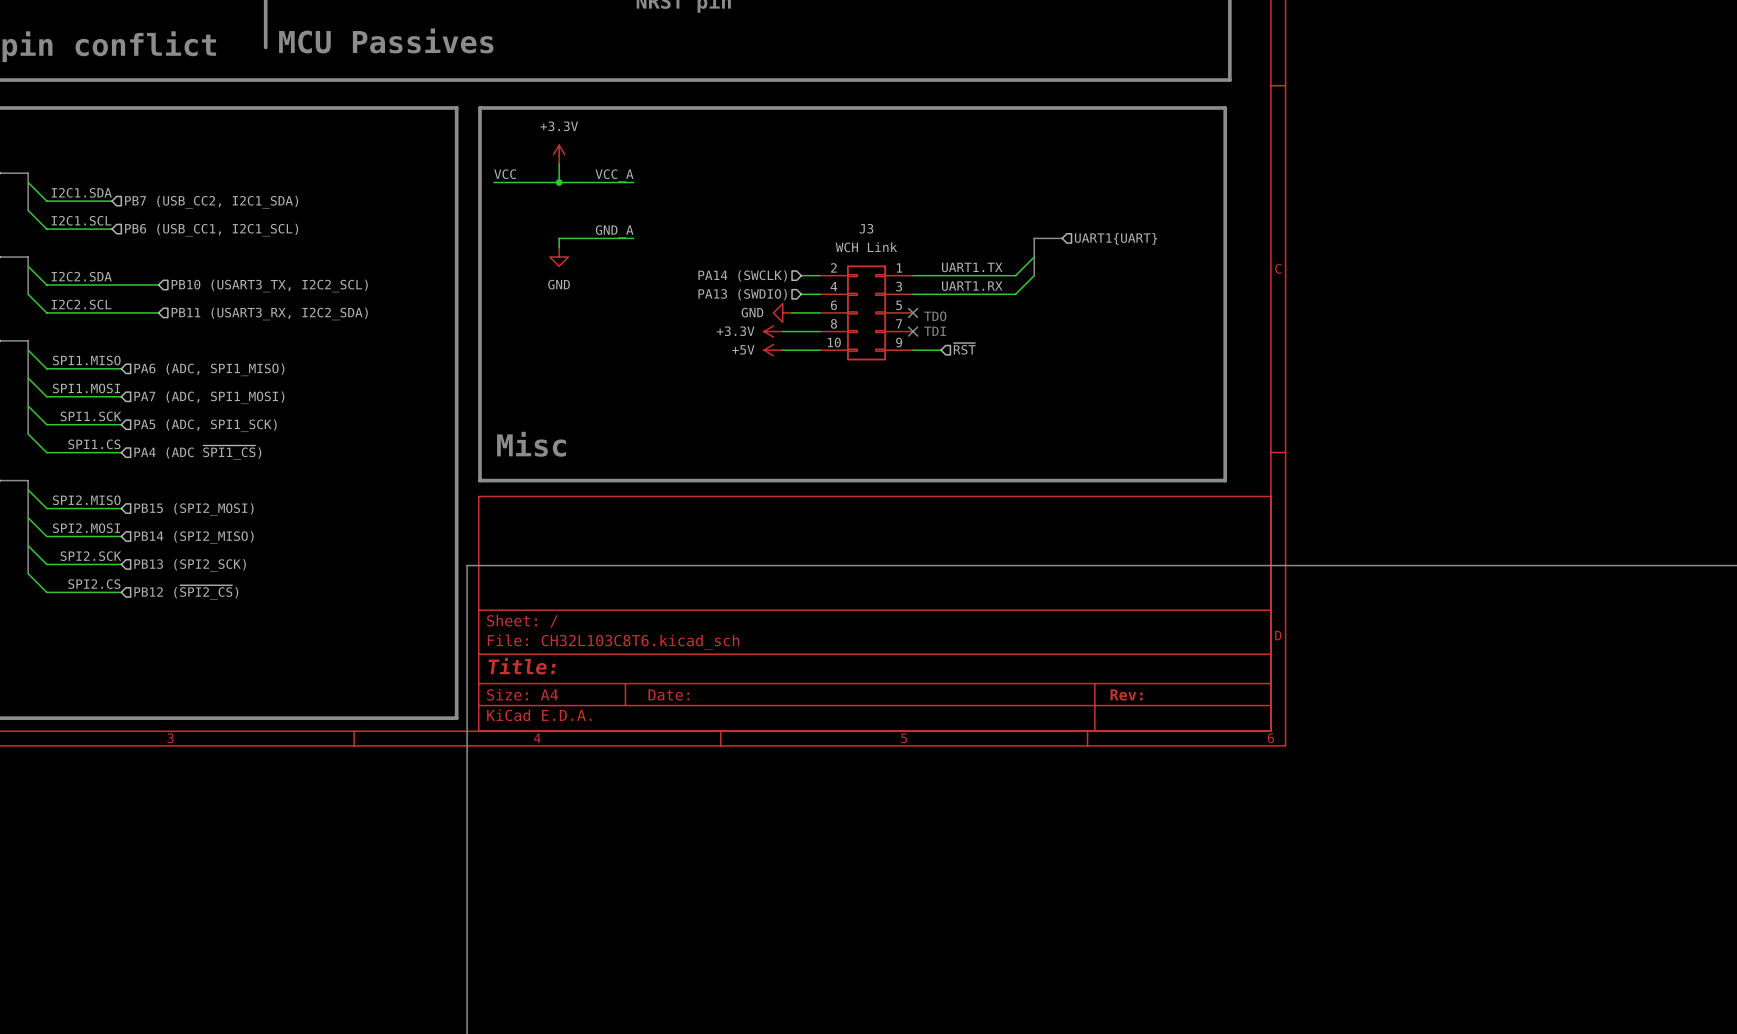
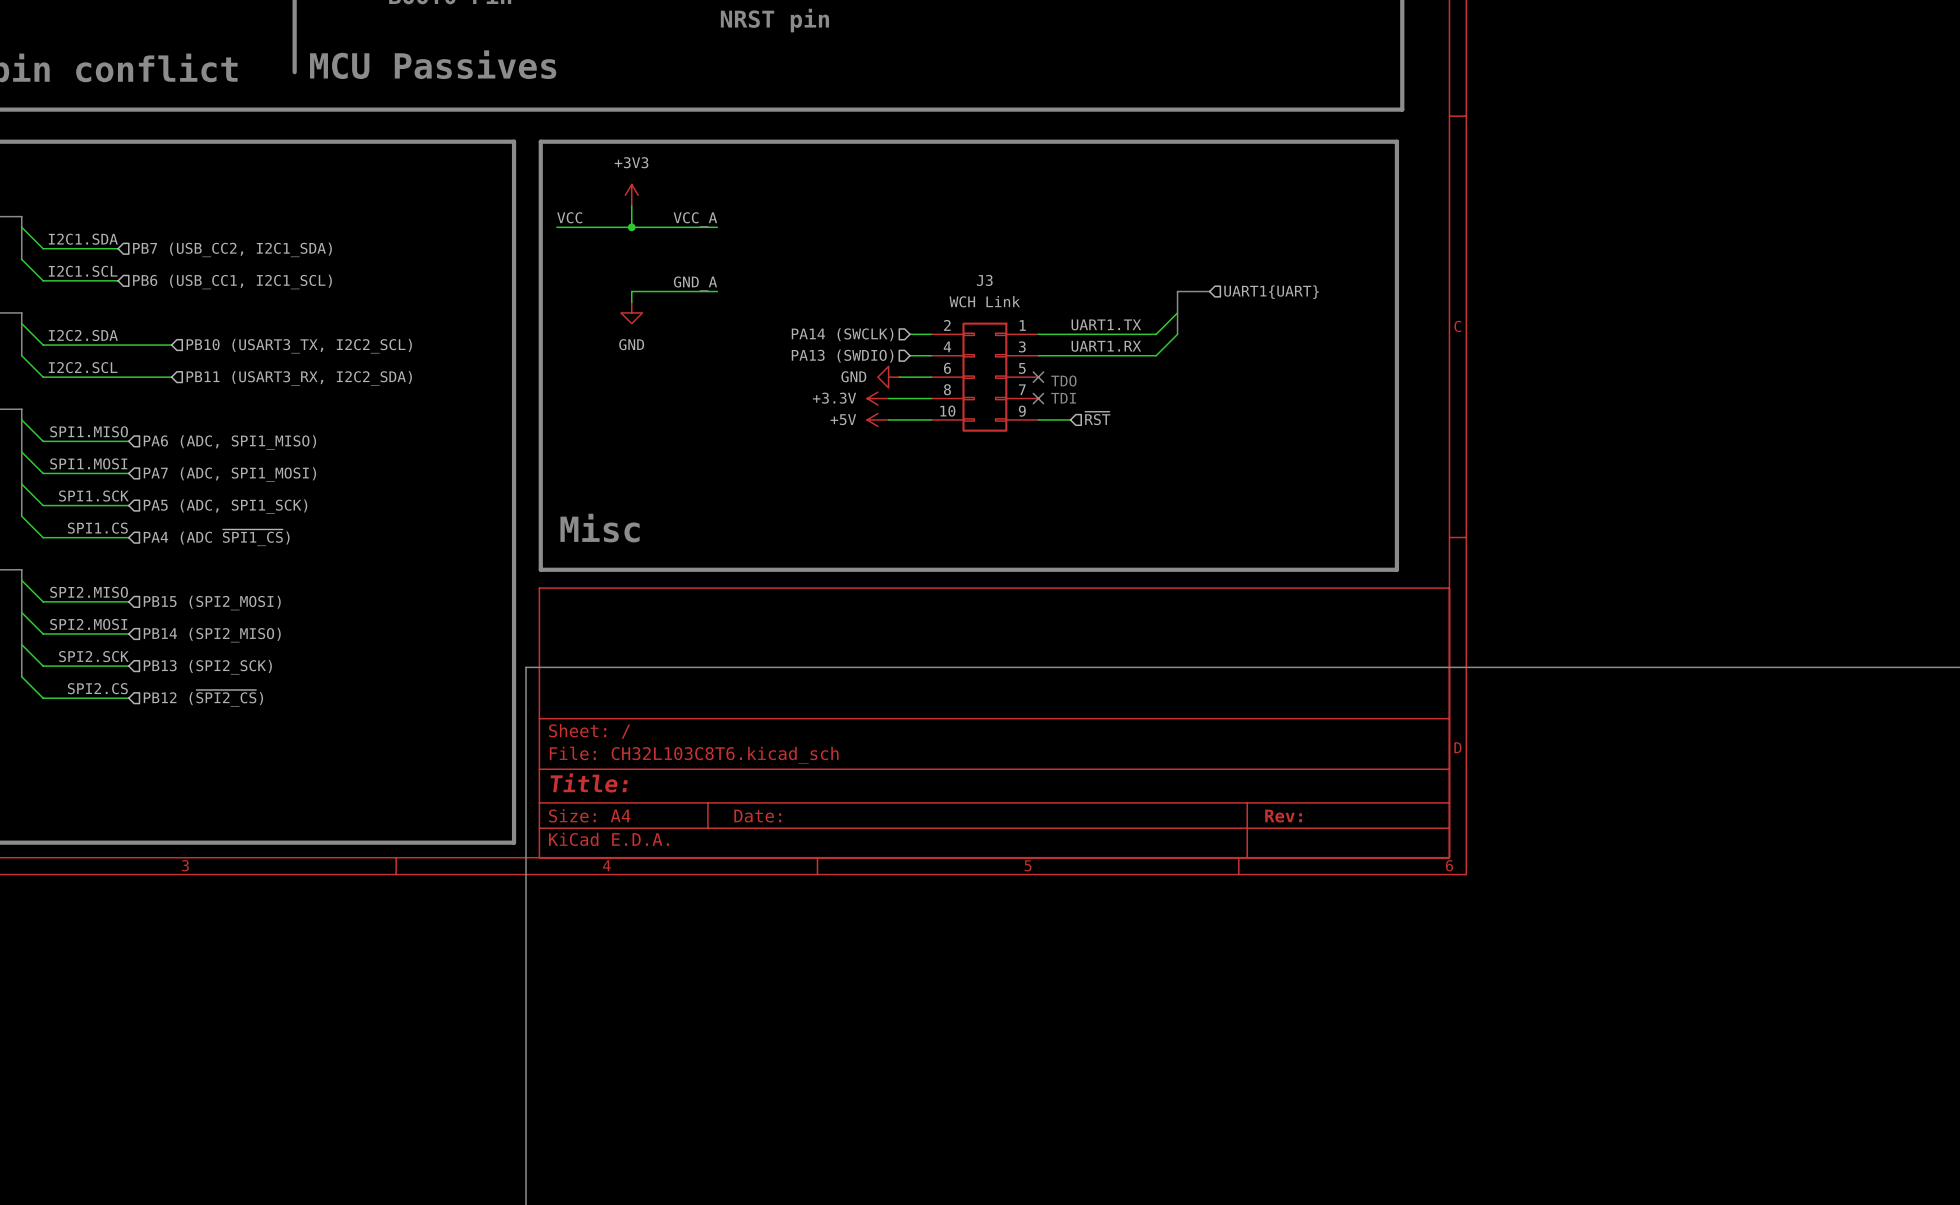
power symbol: +3.3V (559, 154) -> +3V3 (631, 195)

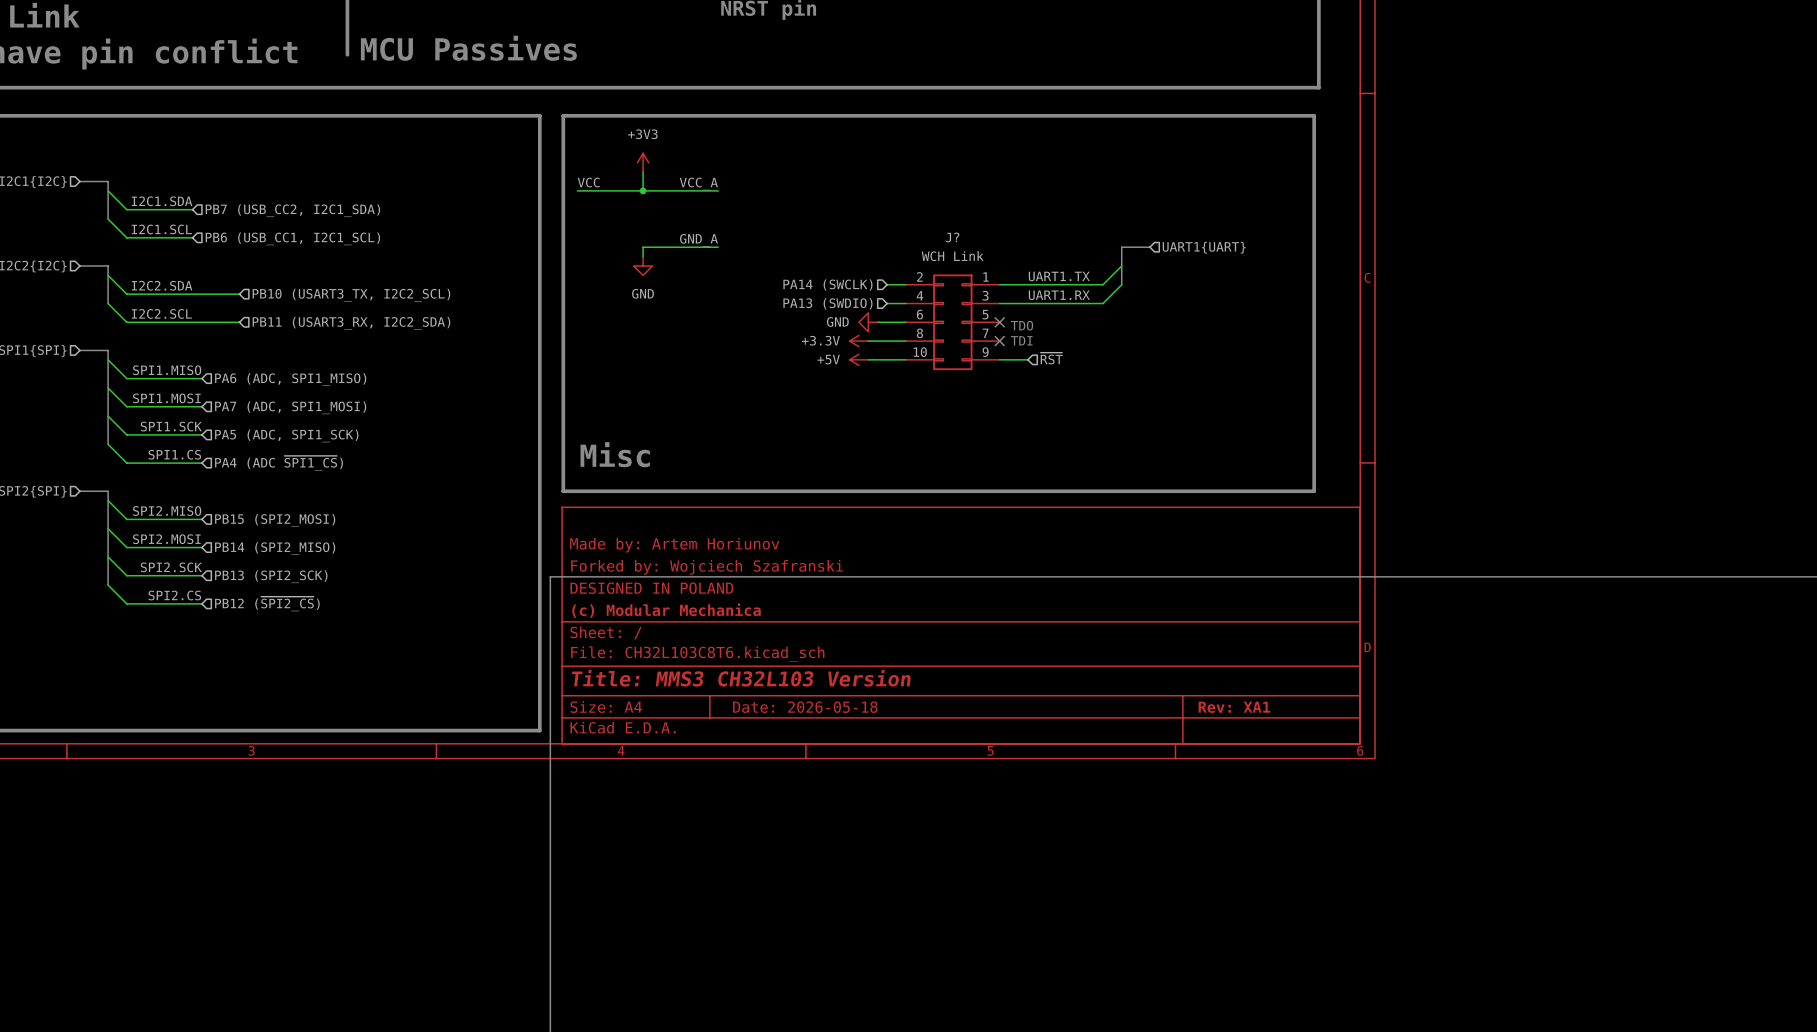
J3 name: J3 (984, 280) -> J? (952, 237)
title block: none -> Made by: Artem Horiunov (674, 545)
title block: none -> Forked by: Wojciech Szafranski (707, 567)
title block: none -> DESIGNED IN POLAND (651, 588)
title block: none -> (c) Modular Mechanica (666, 610)
title block: Title: (589, 782) -> Title: MMS3 CH32L103 Version (741, 678)
title block: Date: (757, 816) -> Date: 2026-05-18 (805, 707)
title block: Rev: (1283, 816) -> Rev: XA1 (1234, 707)

